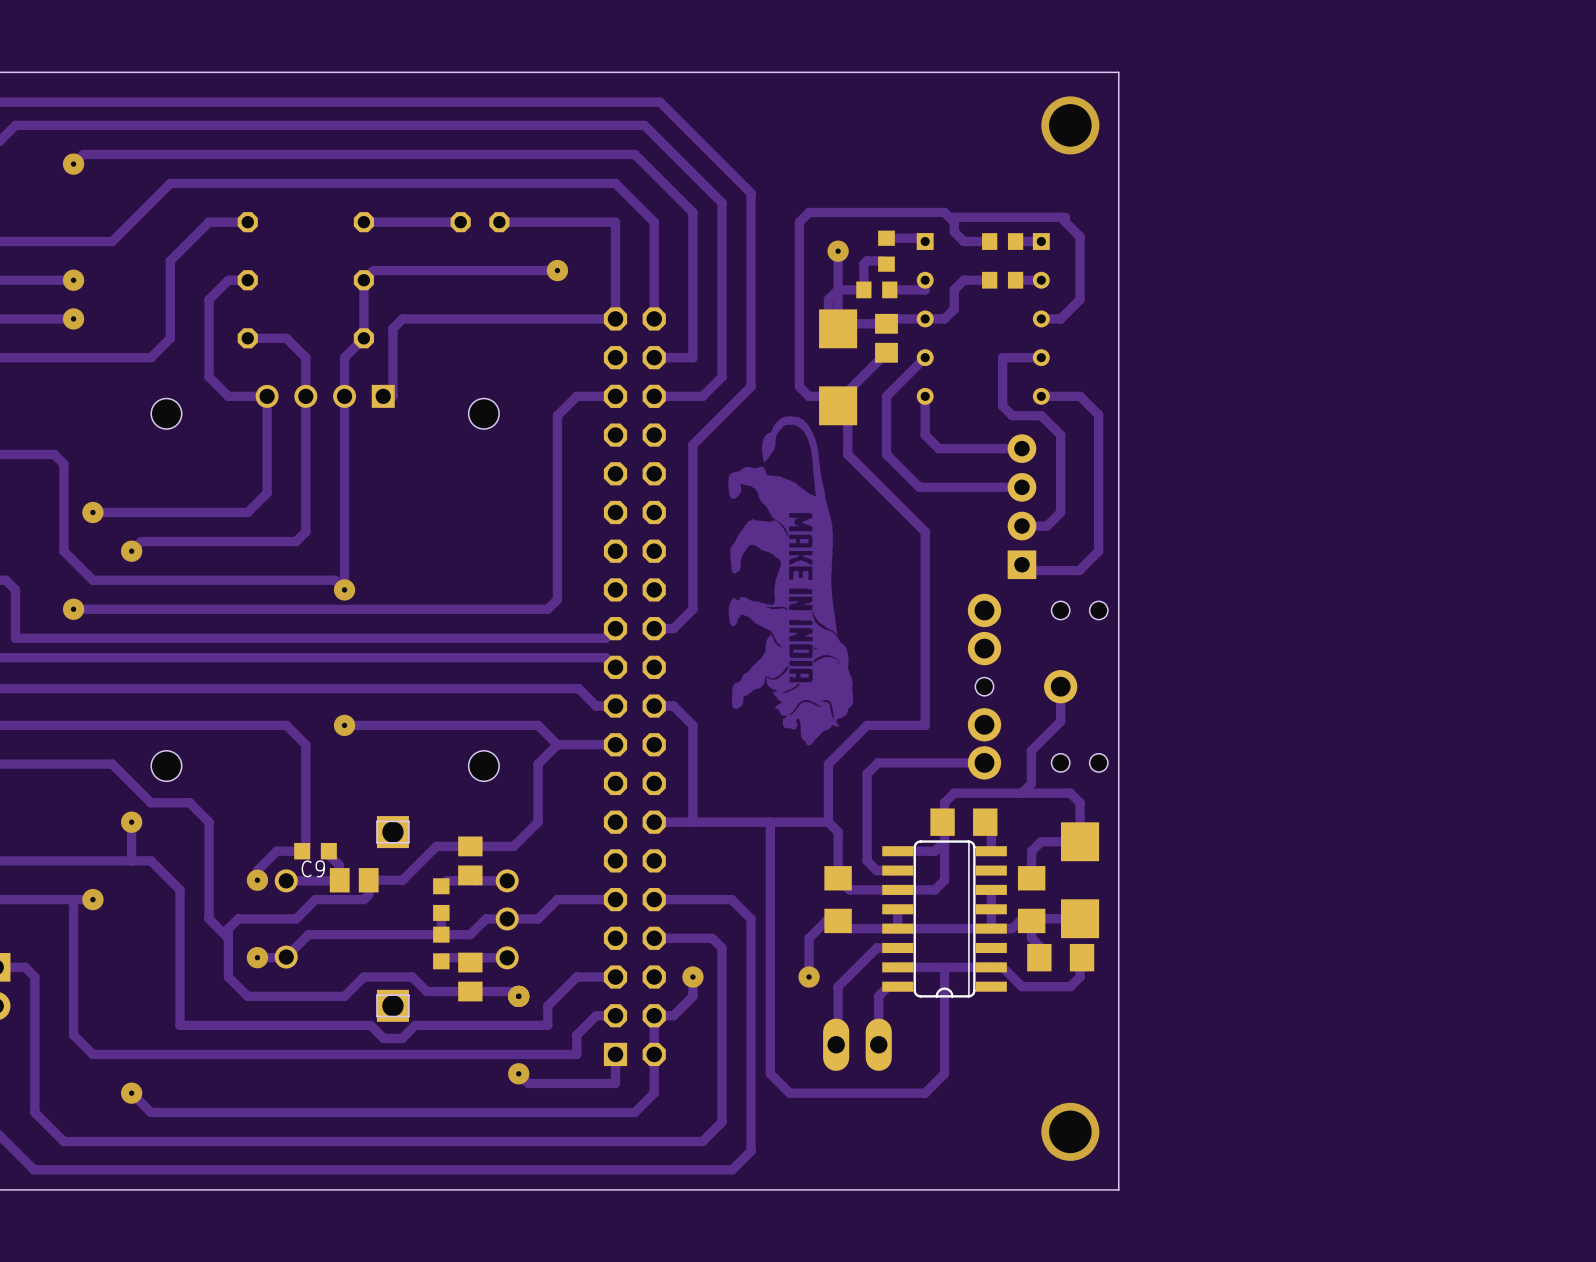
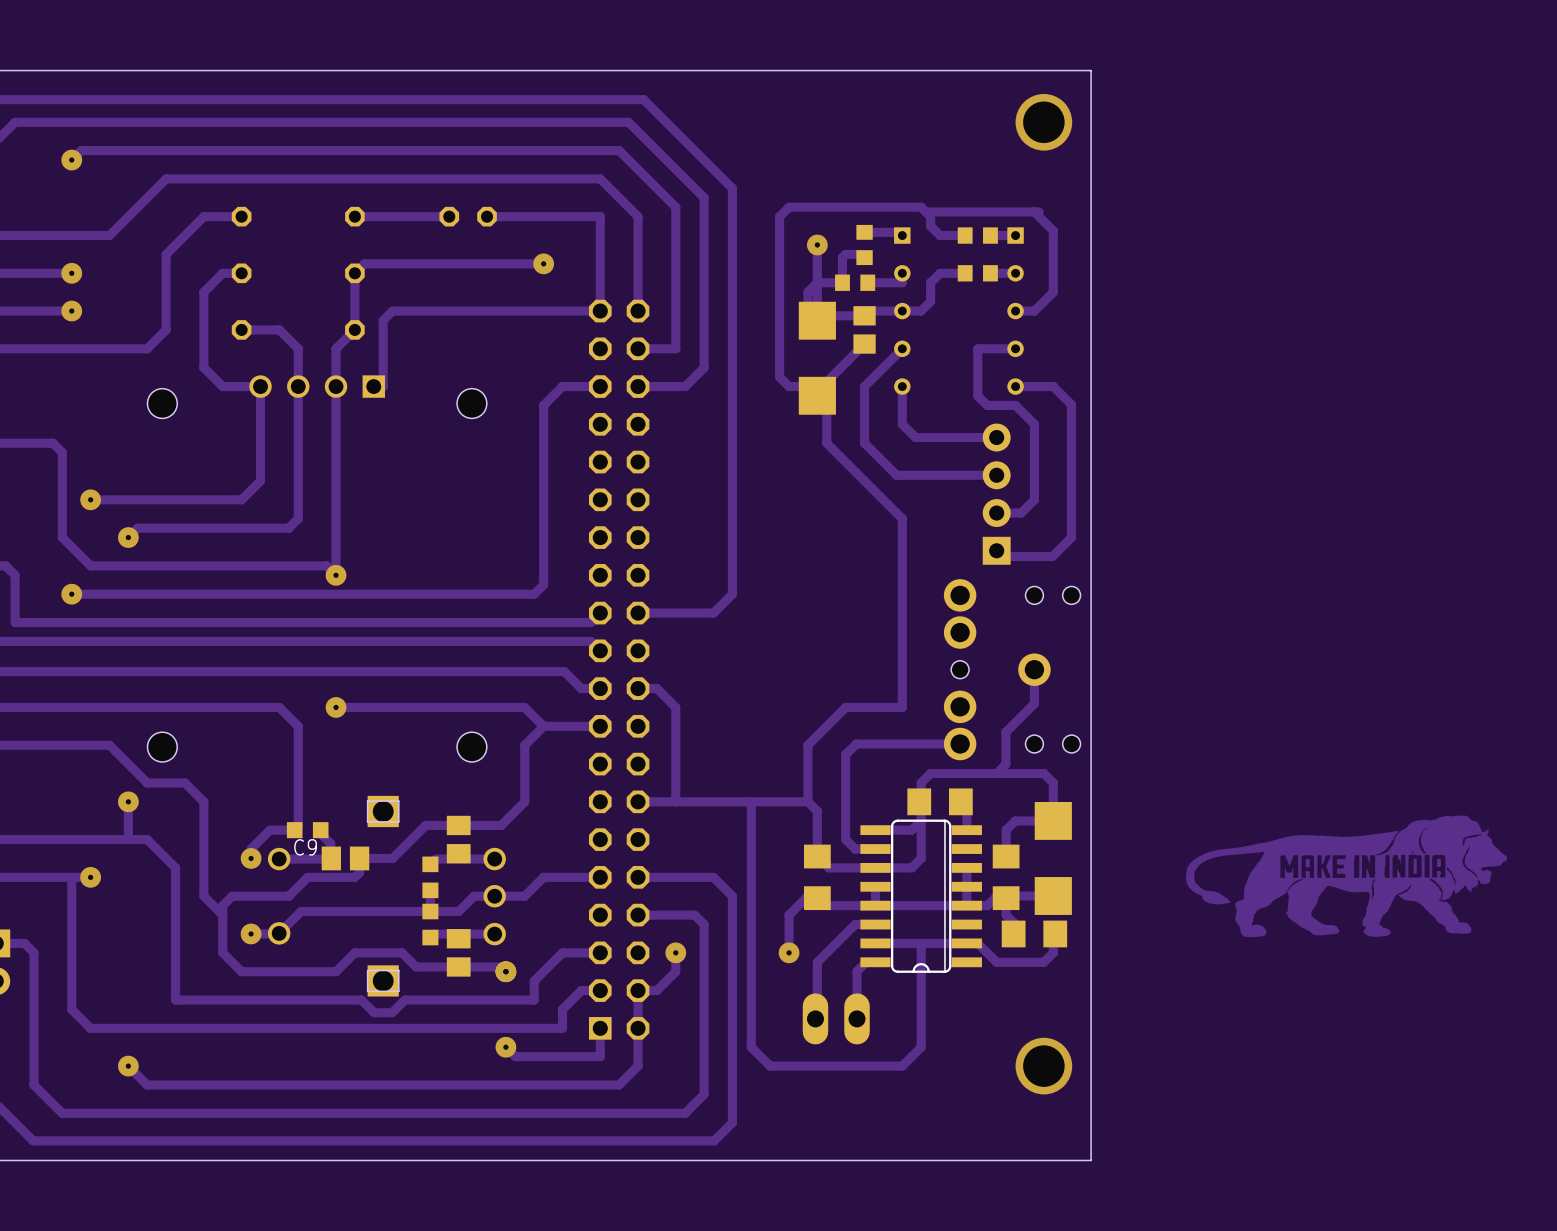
track: (751, 386) (692, 444) (692, 609) (673, 628) -> (732, 377) (732, 594) (713, 613) (656, 613)
drawing: [728, 416, 854, 746] -> none
drawing: none -> [1186, 815, 1507, 938]
via position: (1070, 1131) -> (1043, 1066)

